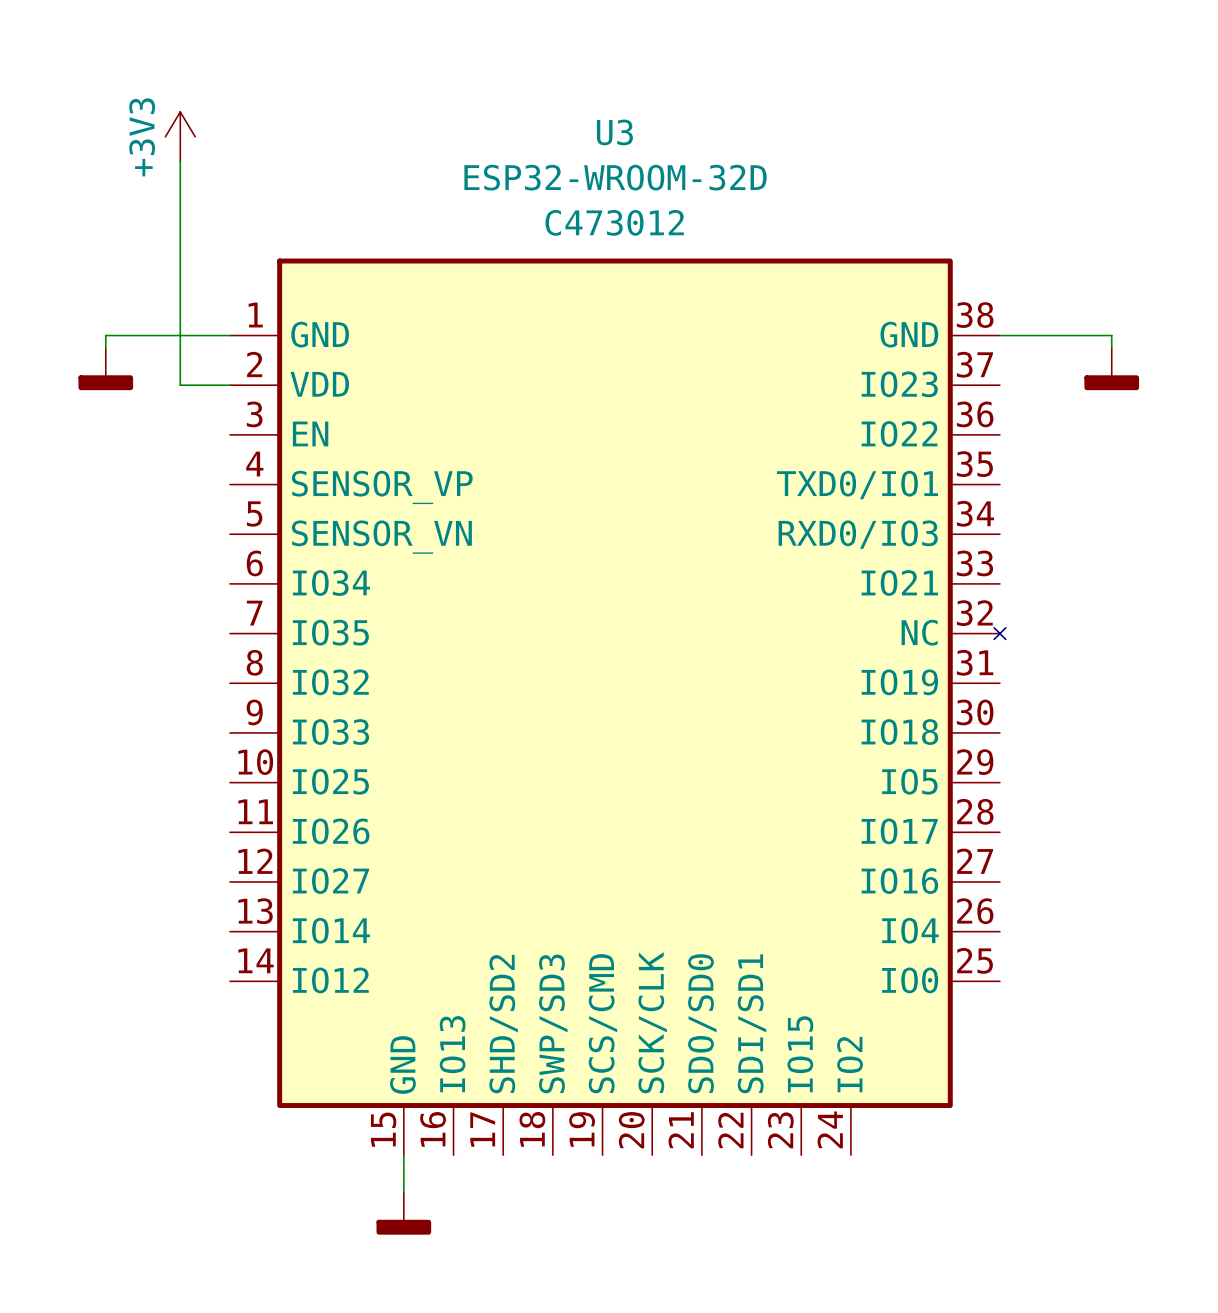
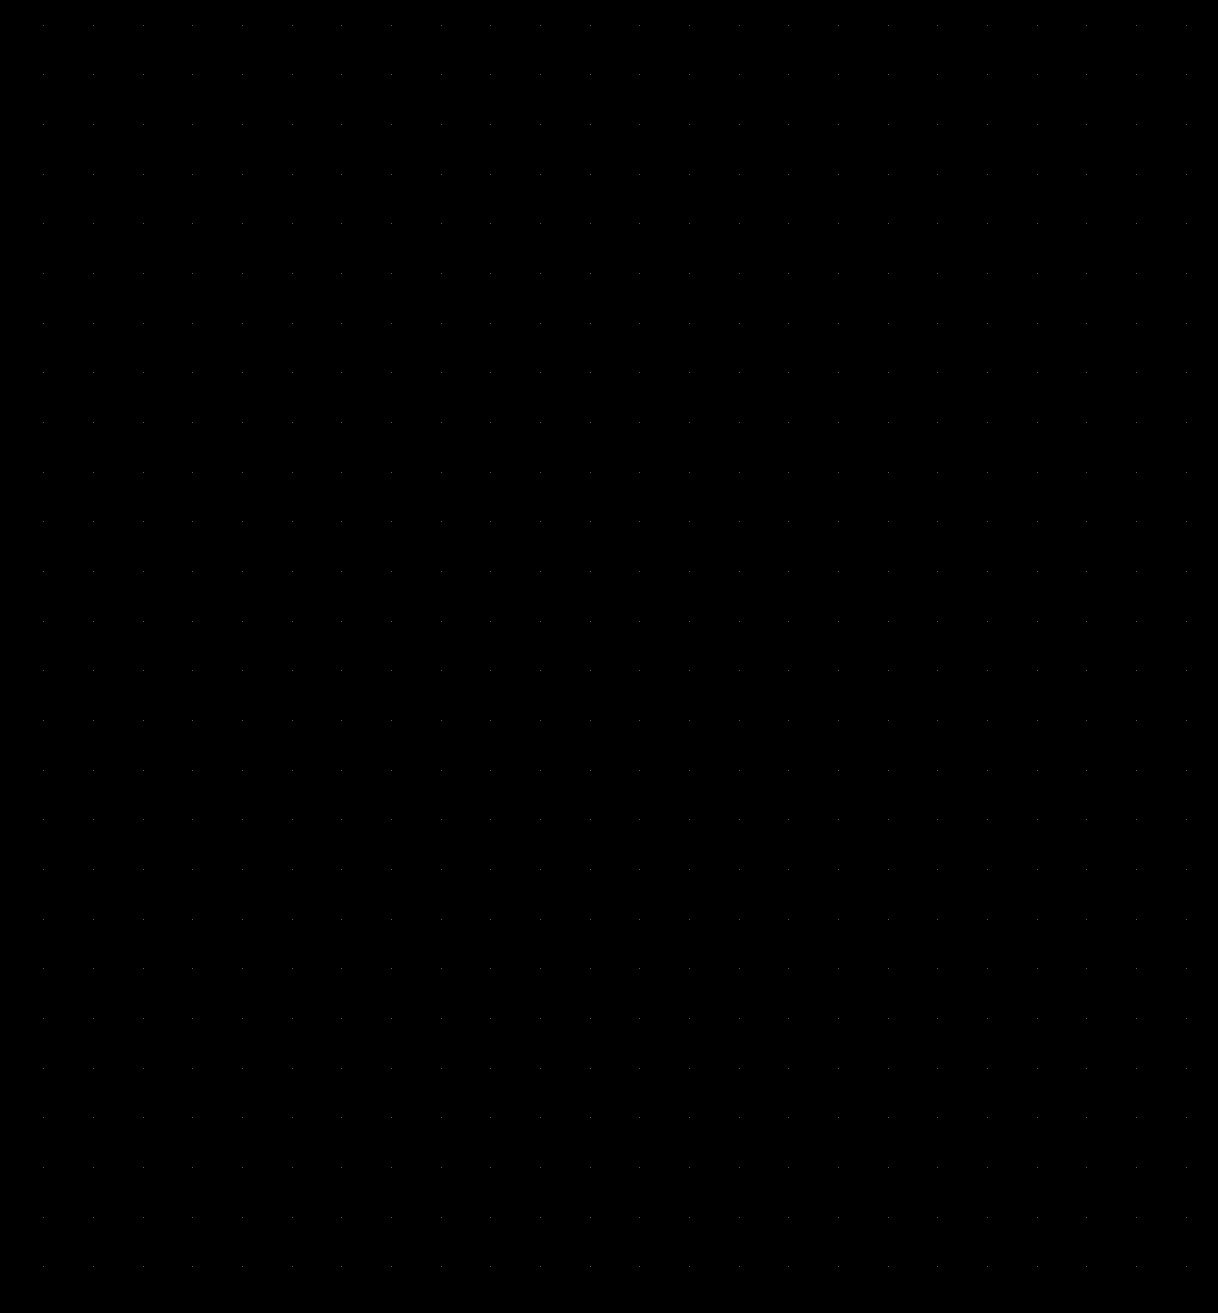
power symbol: +3V3 (180, 136) -> none
wire: (180, 161) (180, 385) (229, 385) -> none
wire: (229, 335) (105, 335) (105, 347) -> none
wire: (999, 335) (1111, 335) (1111, 347) -> none
power symbol: (105, 369) -> none
power symbol: (1111, 369) -> none
U3: ESP32-WROOM-32D (617, 706) -> none
wire: (403, 1155) (403, 1192) -> none
power symbol: (403, 1213) -> none

